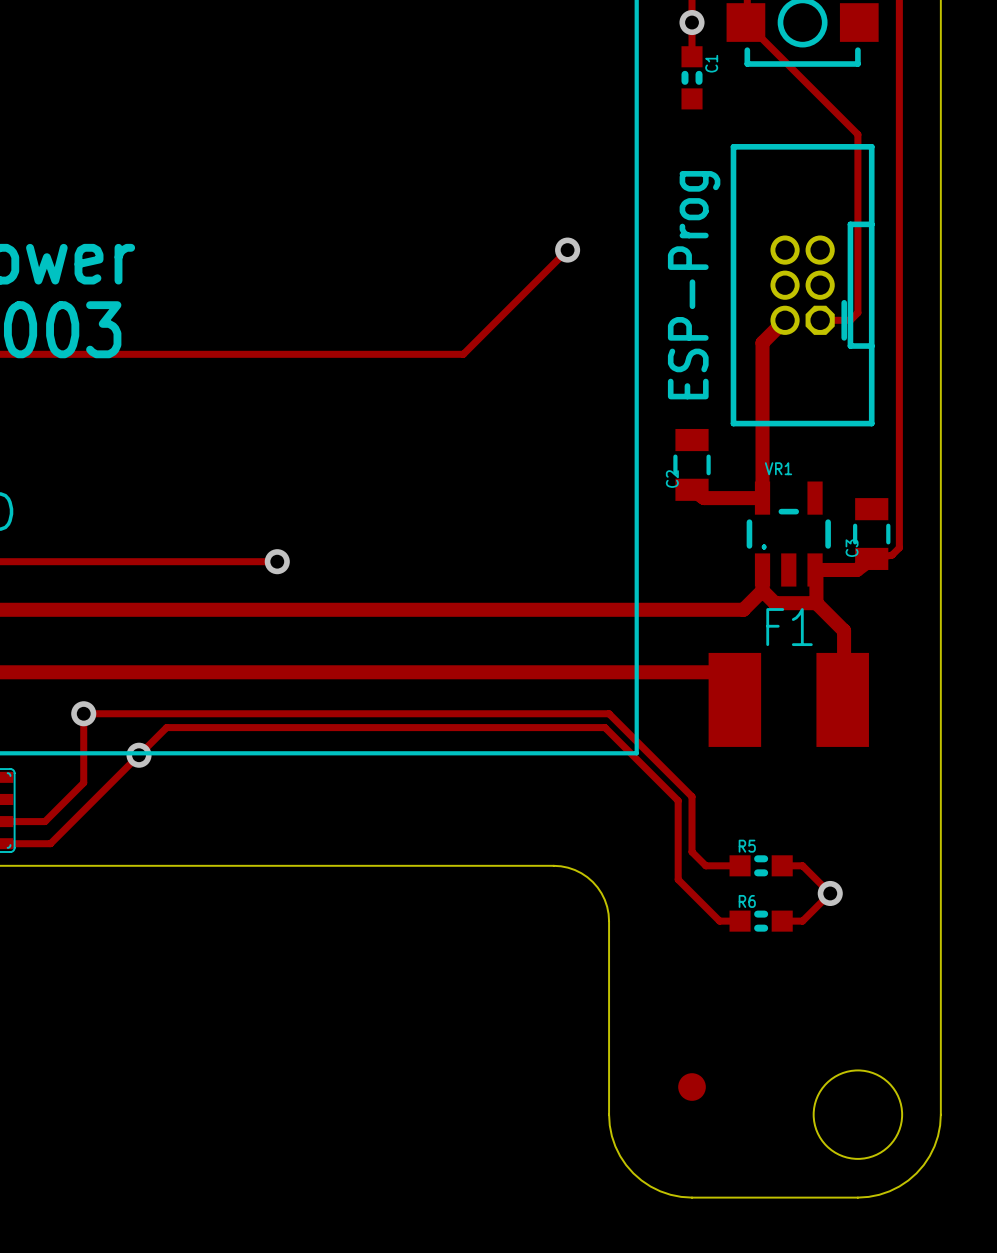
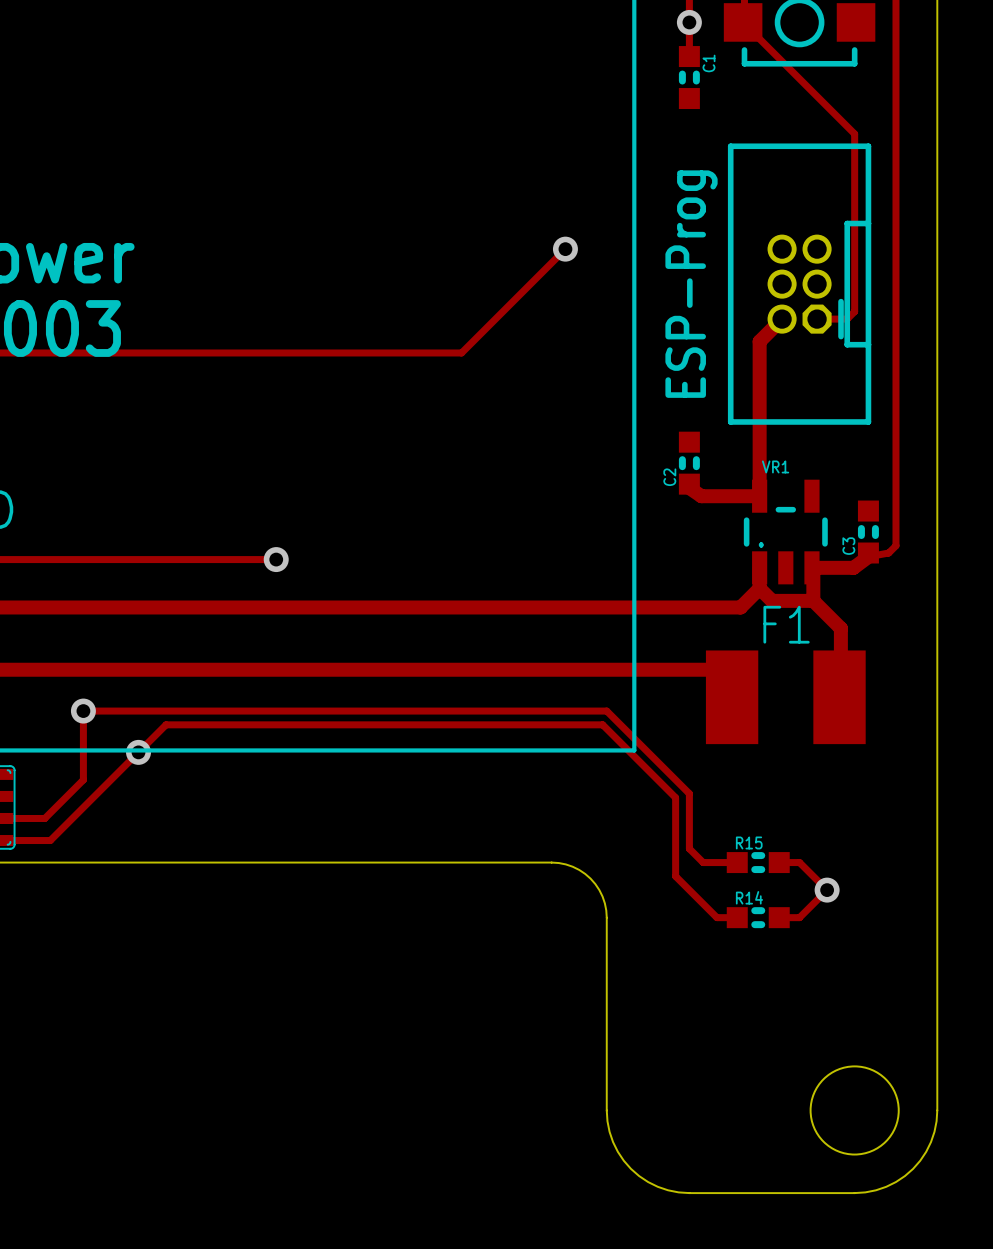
C2 footprint: [673, 428, 711, 501] -> [678, 431, 700, 495]
C3 footprint: [853, 498, 891, 570] -> [857, 500, 879, 564]
R5 name: R5 (747, 846) -> R15 (749, 842)
R6 name: R6 (747, 901) -> R14 (749, 897)
part: (692, 1087) -> none

